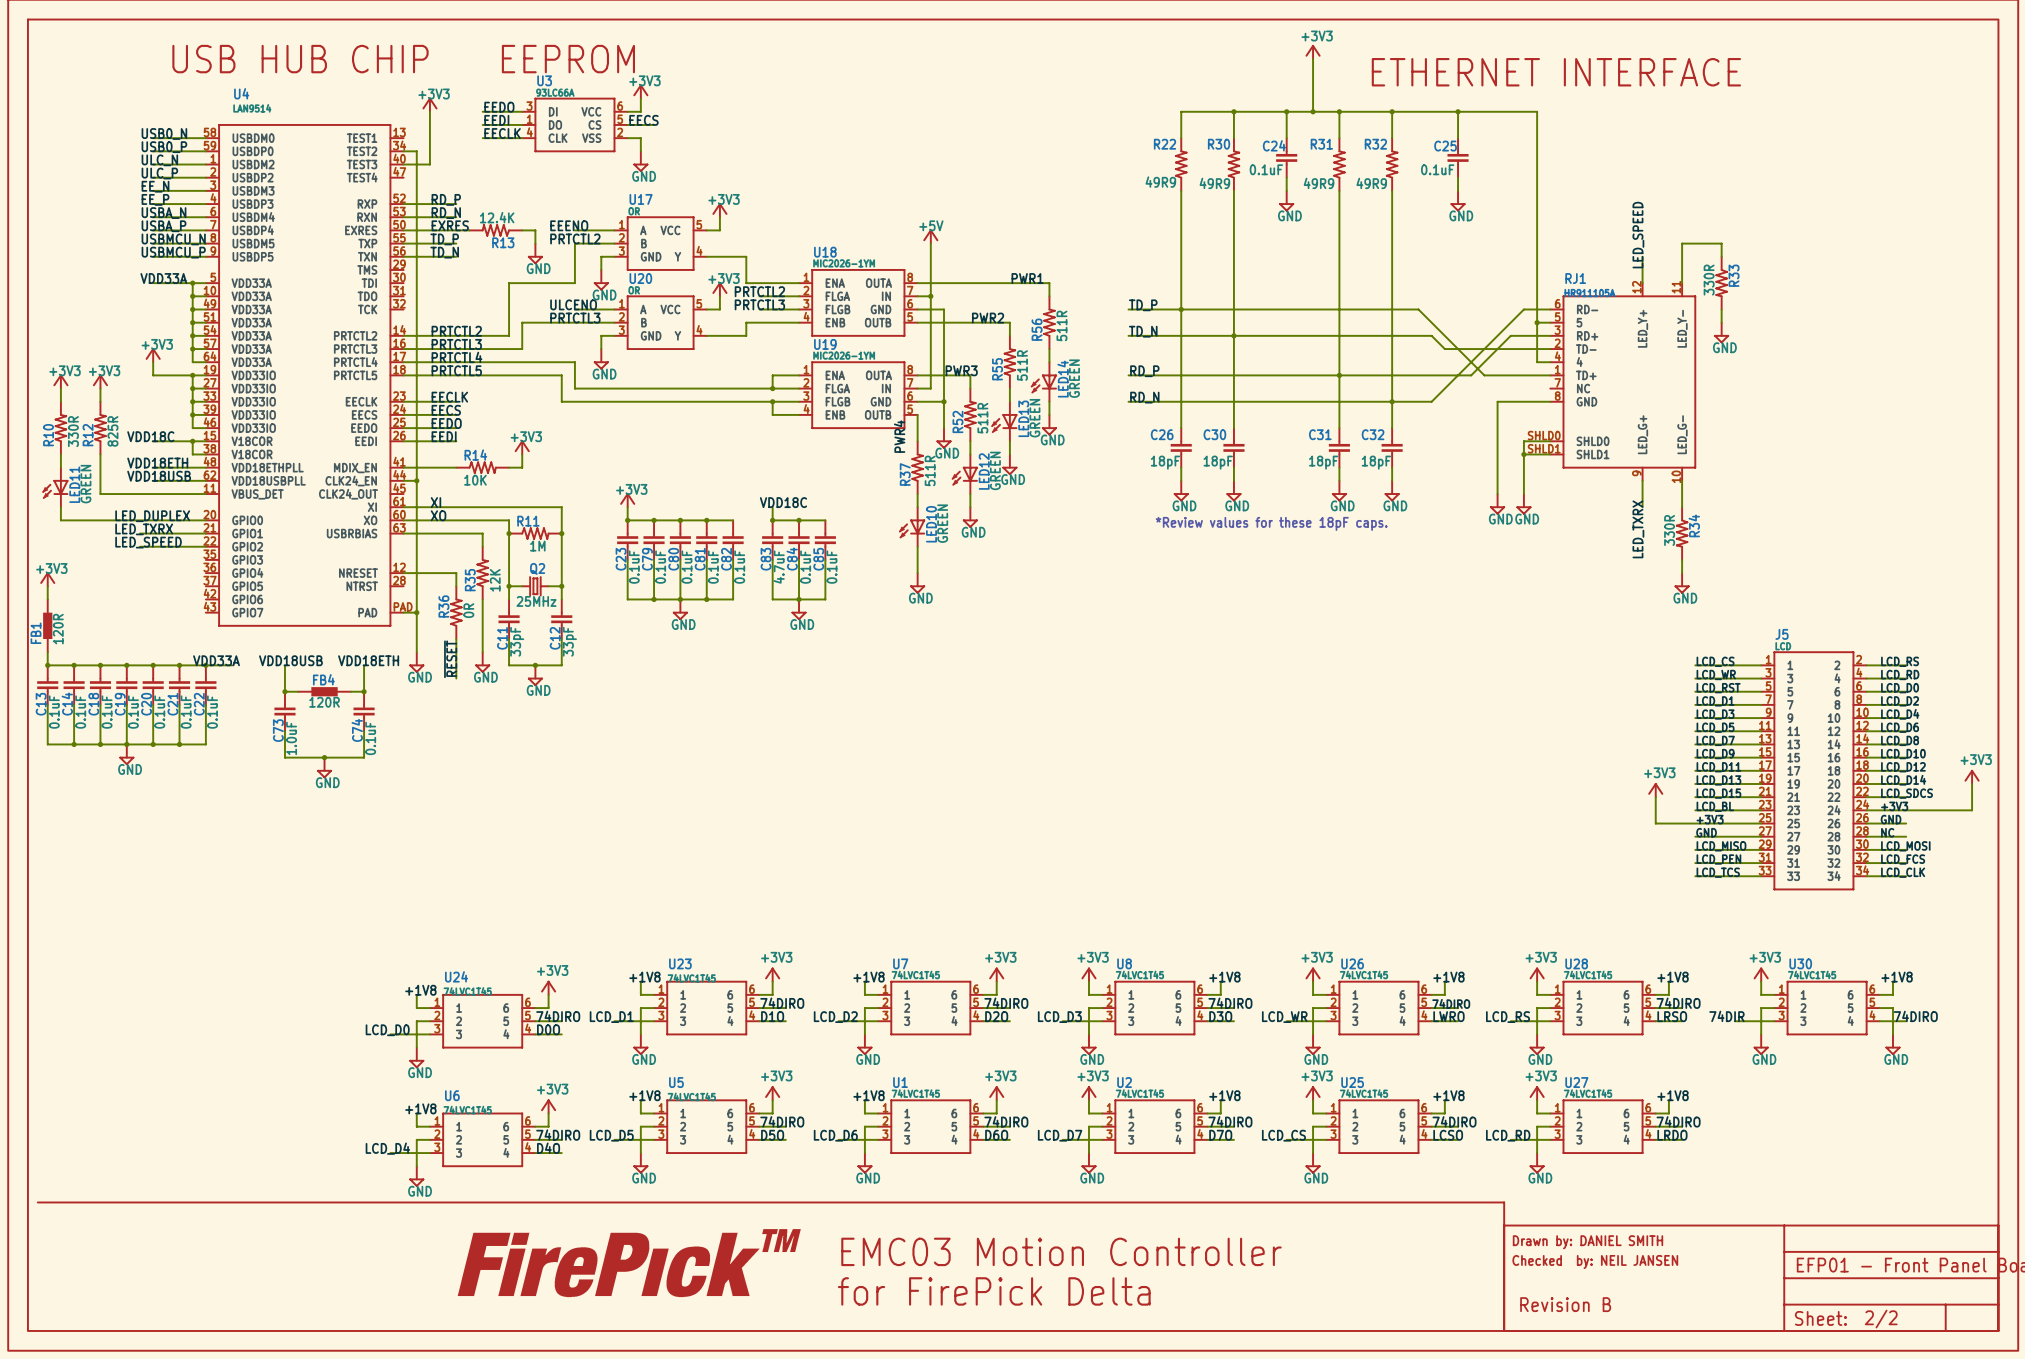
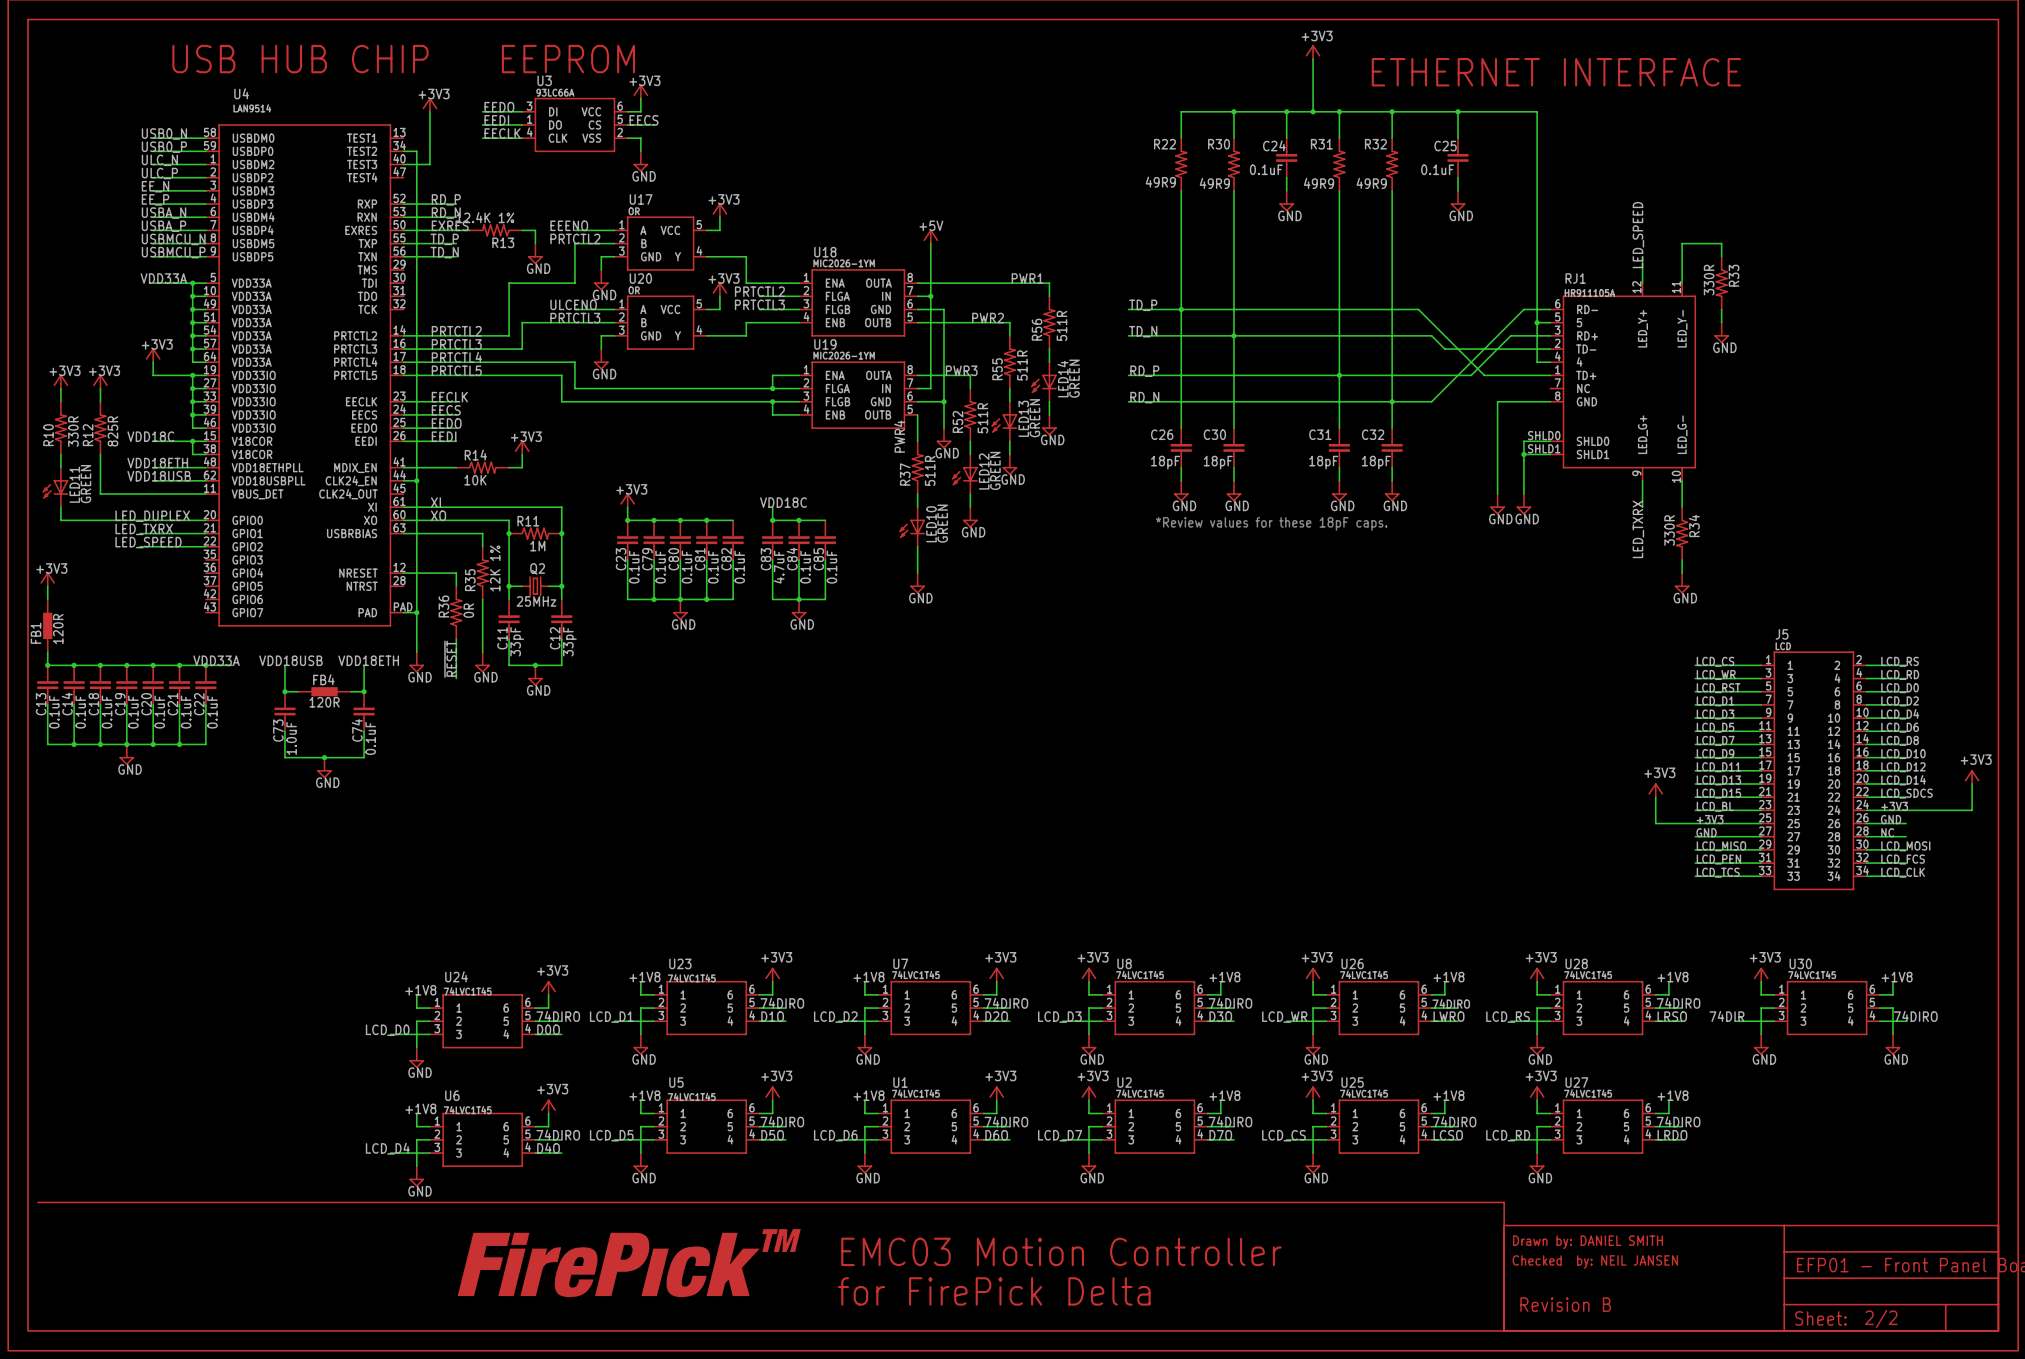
R13 value: 12.4K (497, 217) -> 12.4K 1% (485, 217)
R35 value: 12K (495, 580) -> 12K 1% (495, 568)

